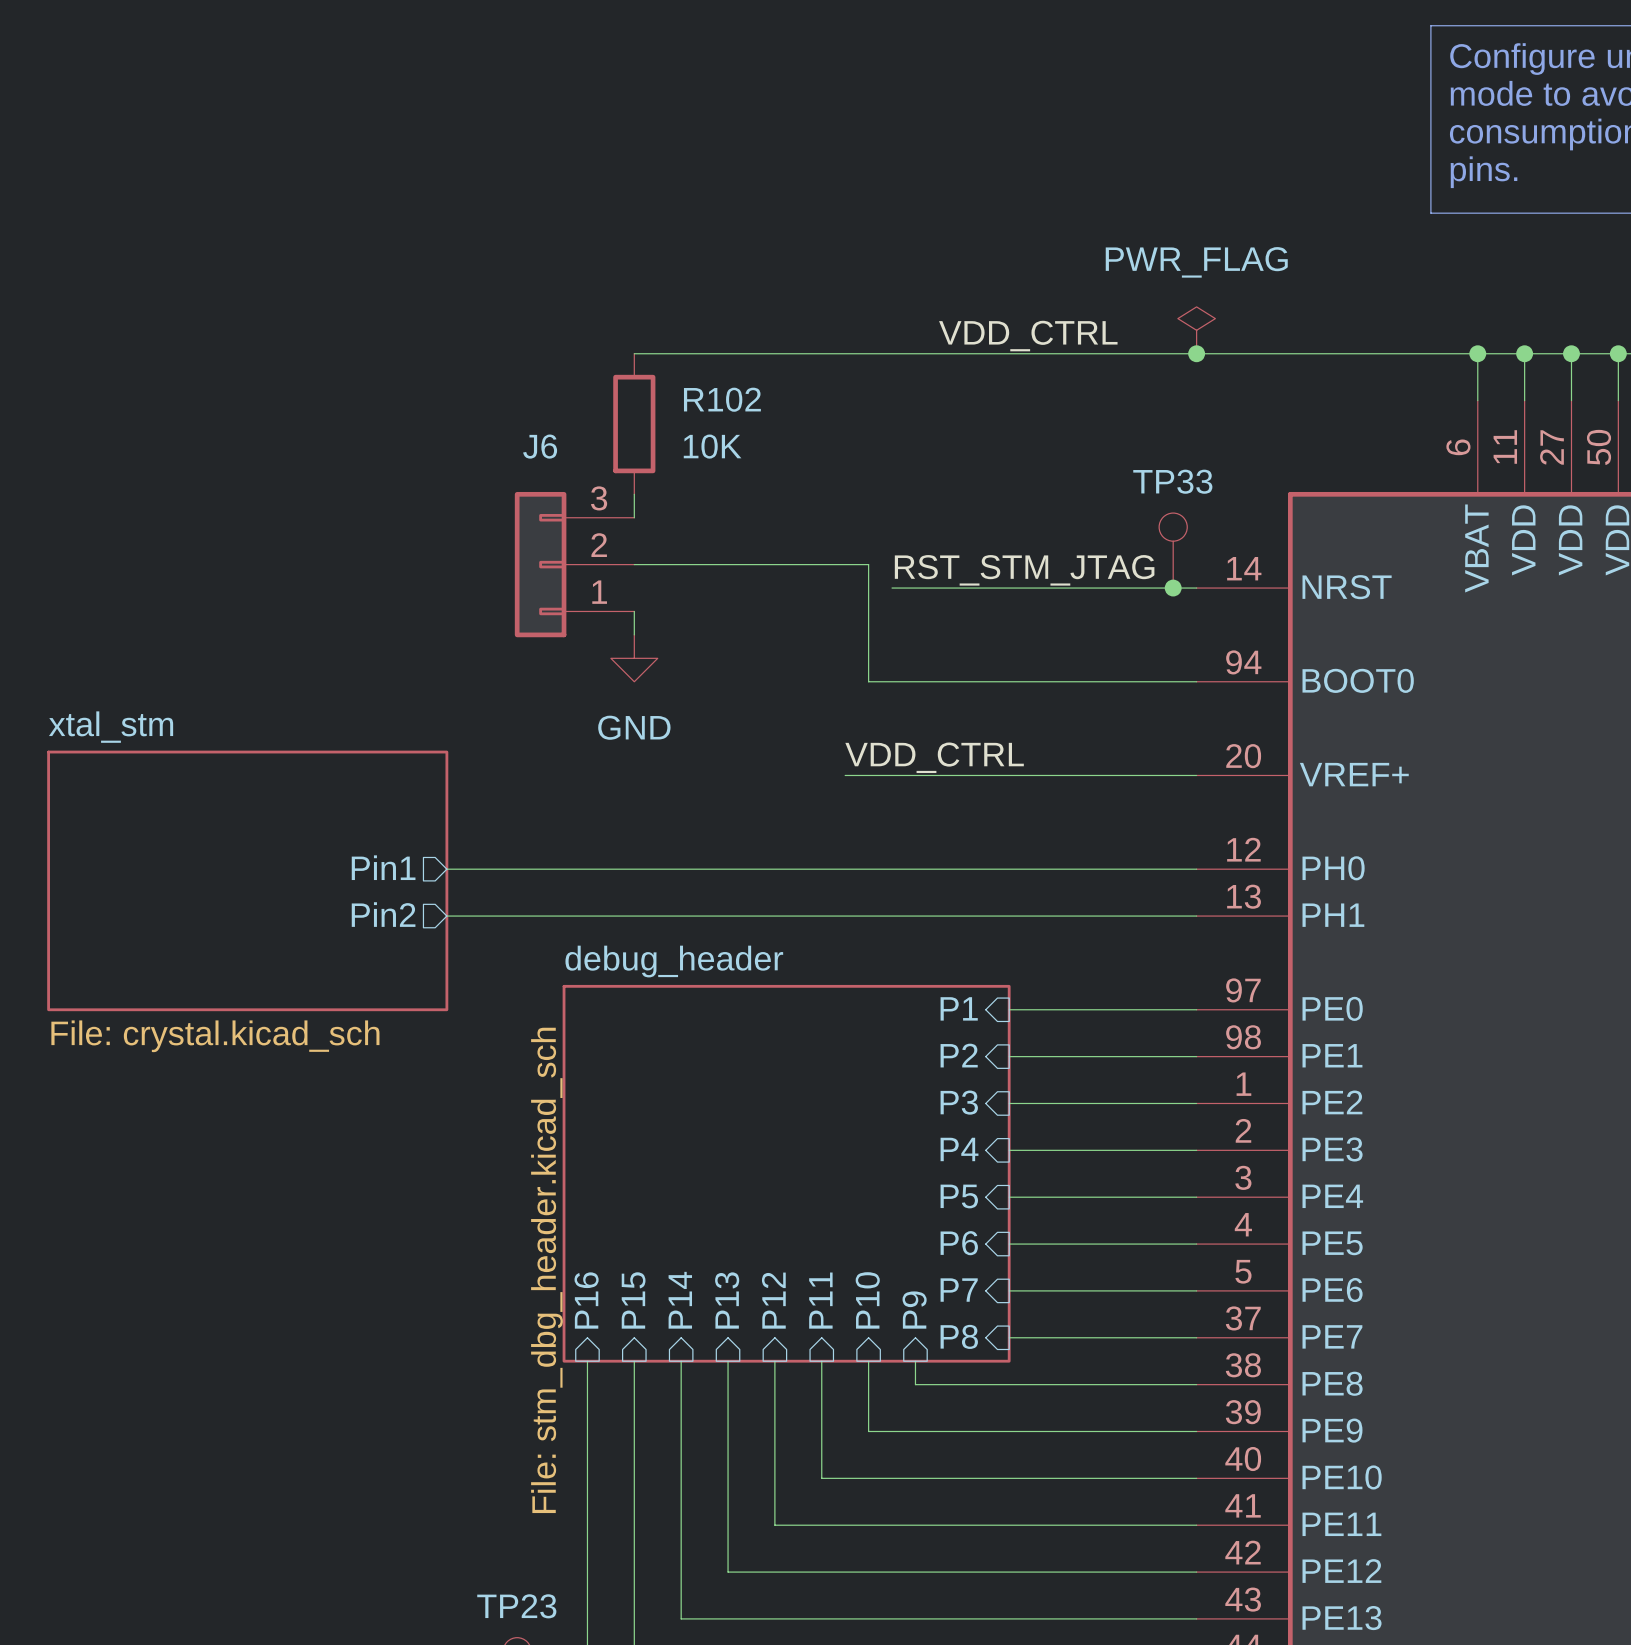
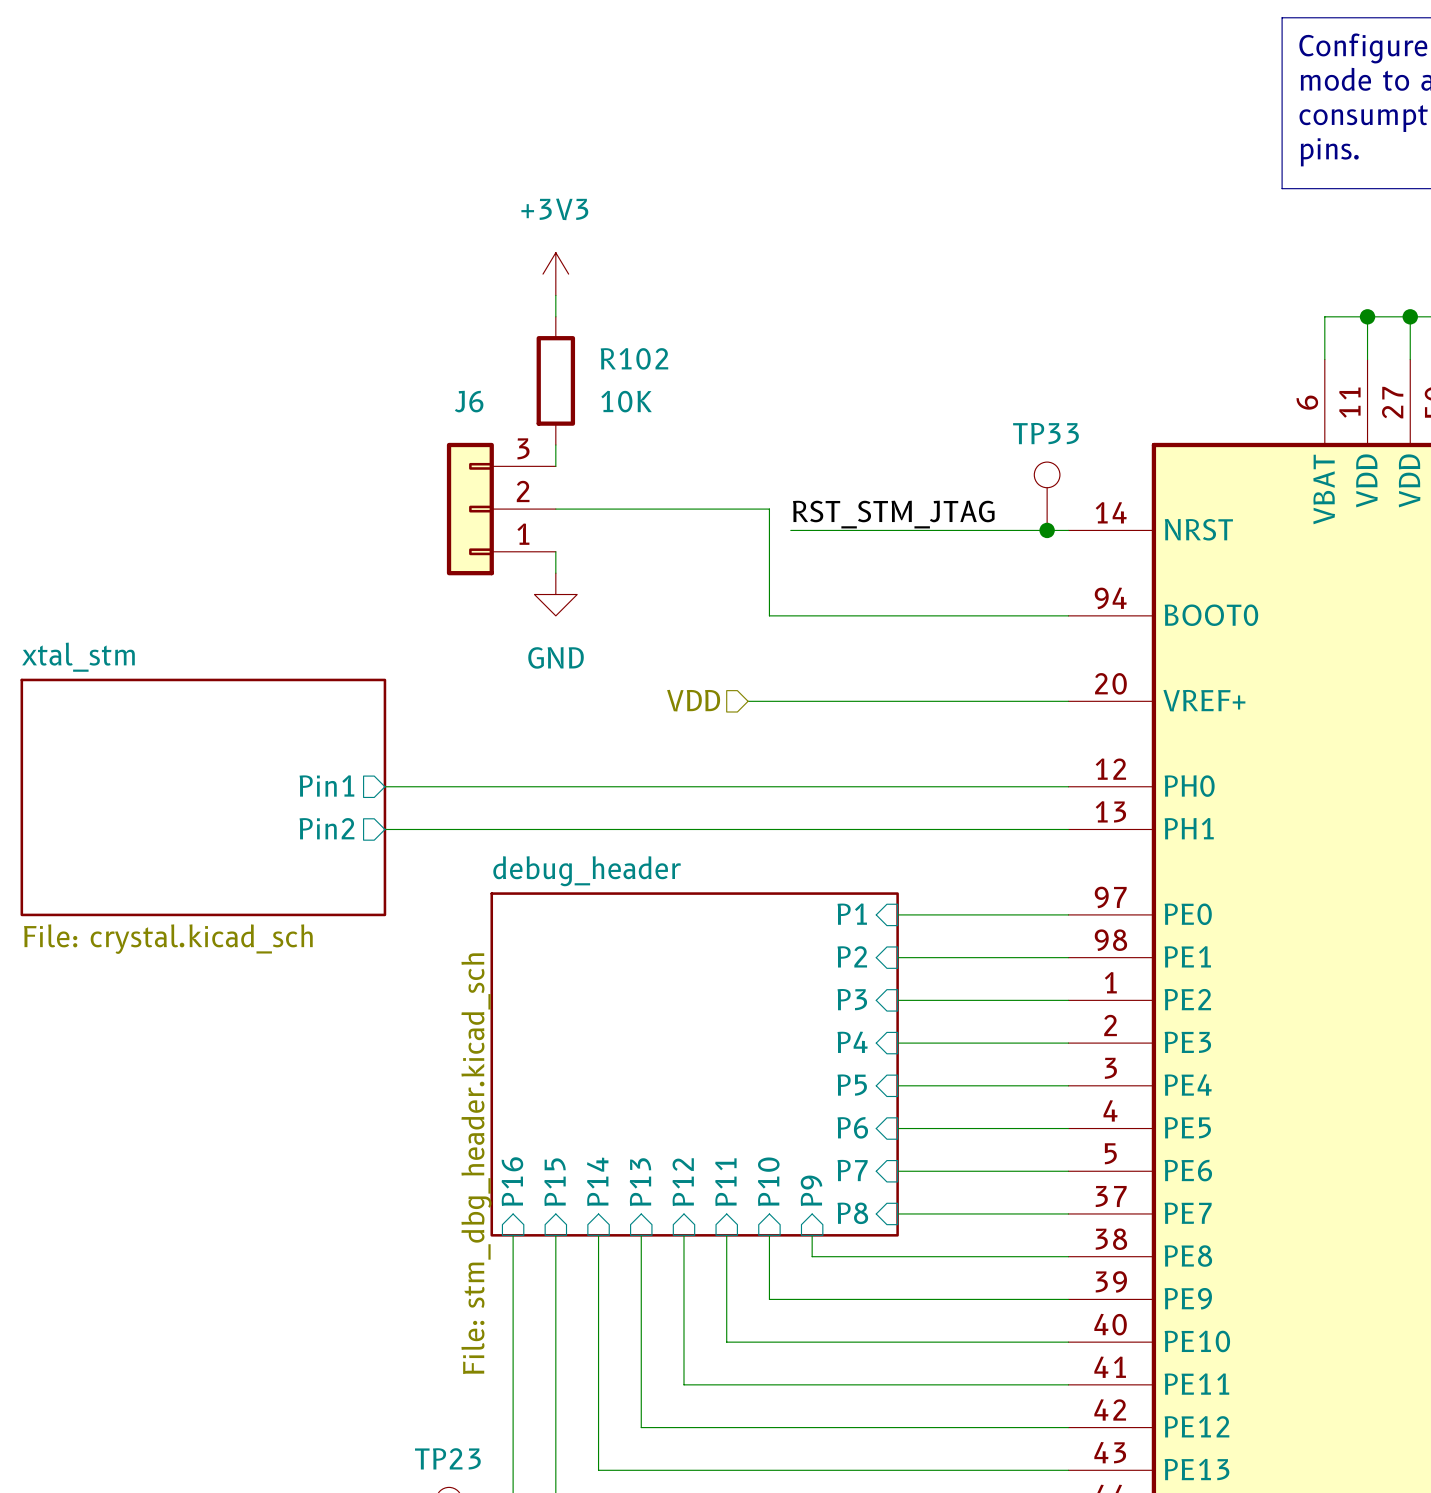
power symbol: none -> +3V3 (555, 274)
power symbol: PWR_FLAG (1196, 330) -> none
label: VDD_CTRL (1028, 336) -> none
wire: (634, 353) (1477, 353) -> (555, 316) (555, 295)
junction: (1196, 353) -> none
junction: (1477, 353) -> none
label: VDD_CTRL (934, 757) -> none
hierarchical label: none -> VDD (693, 700)

